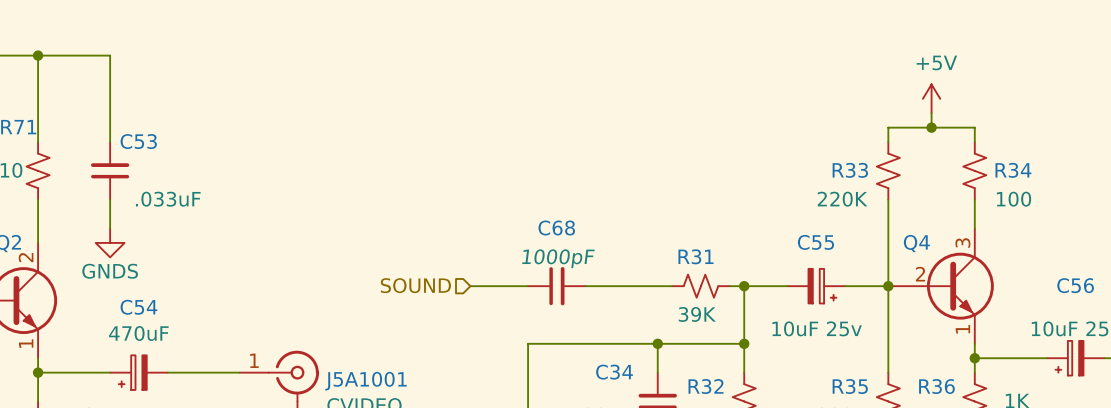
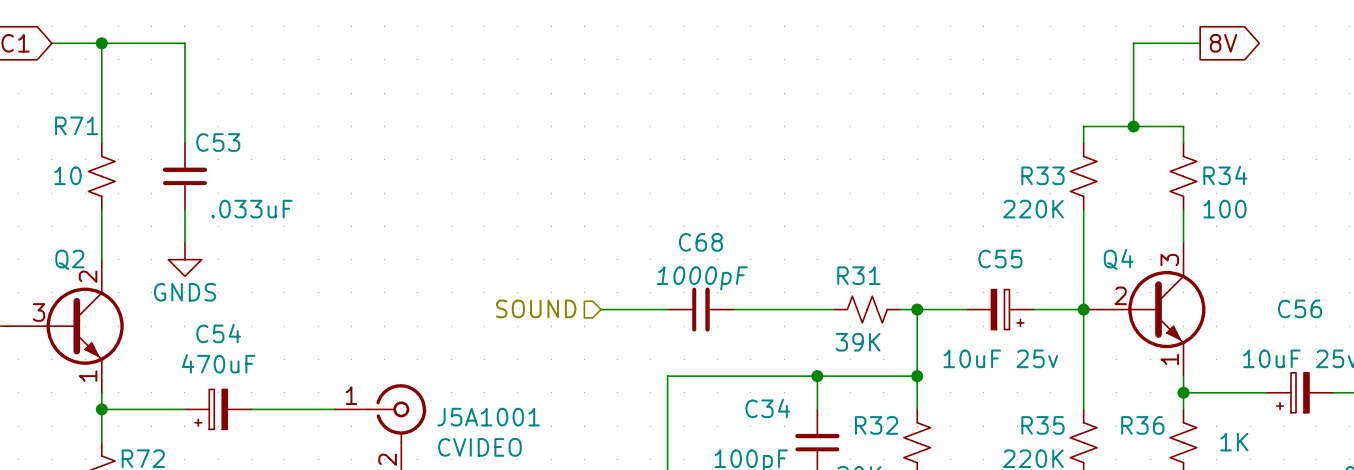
wire: none -> (1200, 43) (1133, 43) (1133, 109)
global label: none -> 8V (1223, 43)
power symbol: +5V (931, 98) -> none

